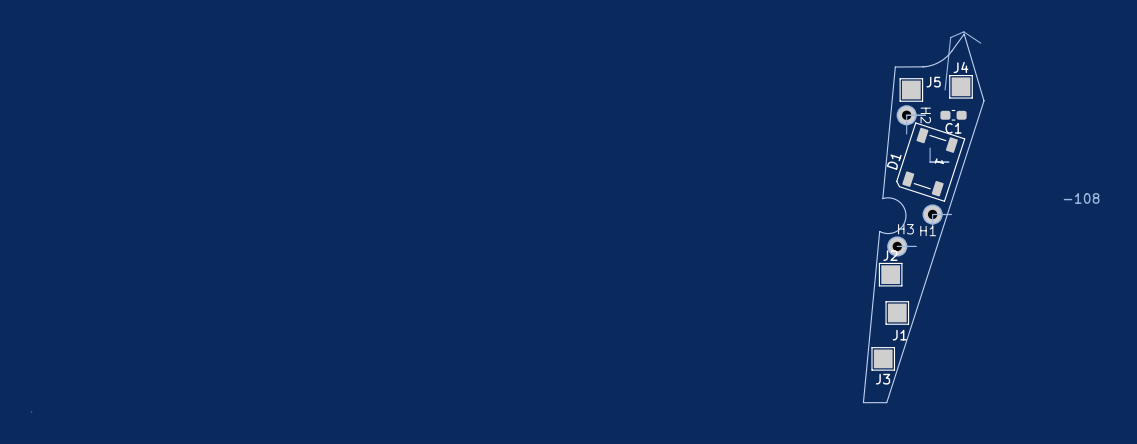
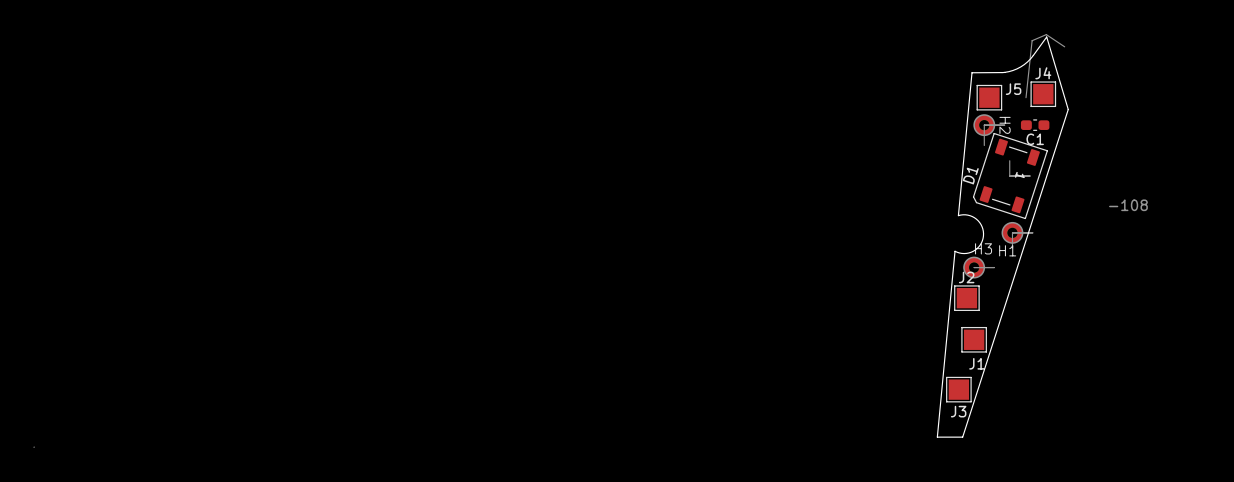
text position: -108 (1081, 198) -> -108 (1128, 205)

